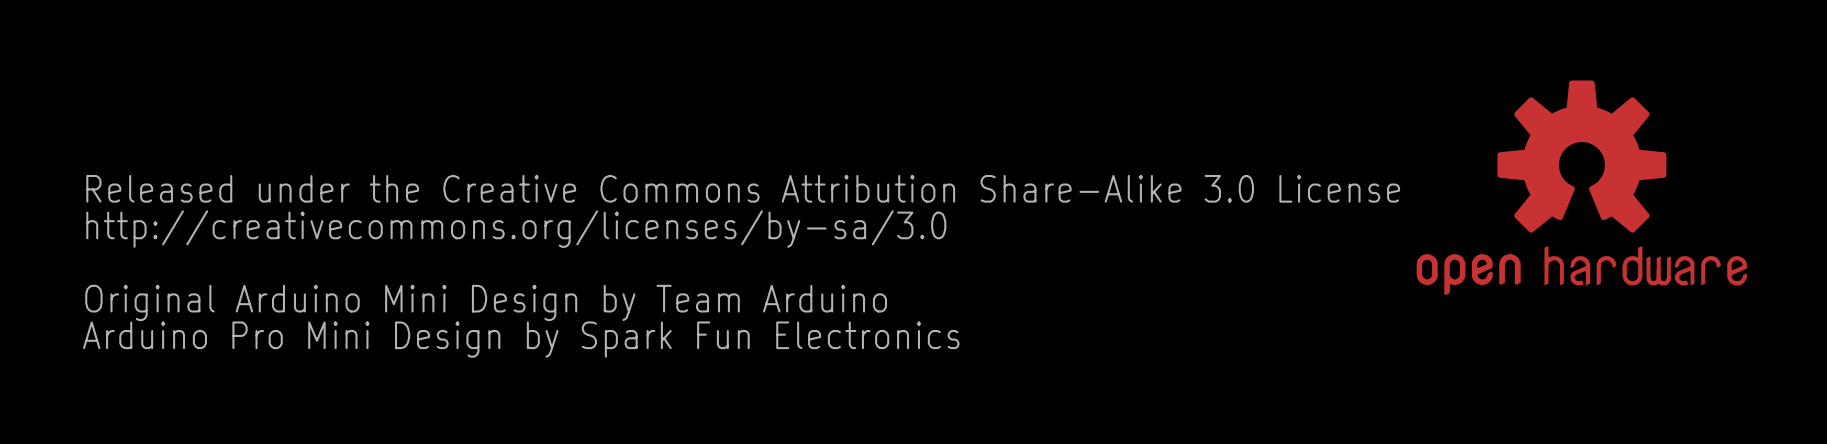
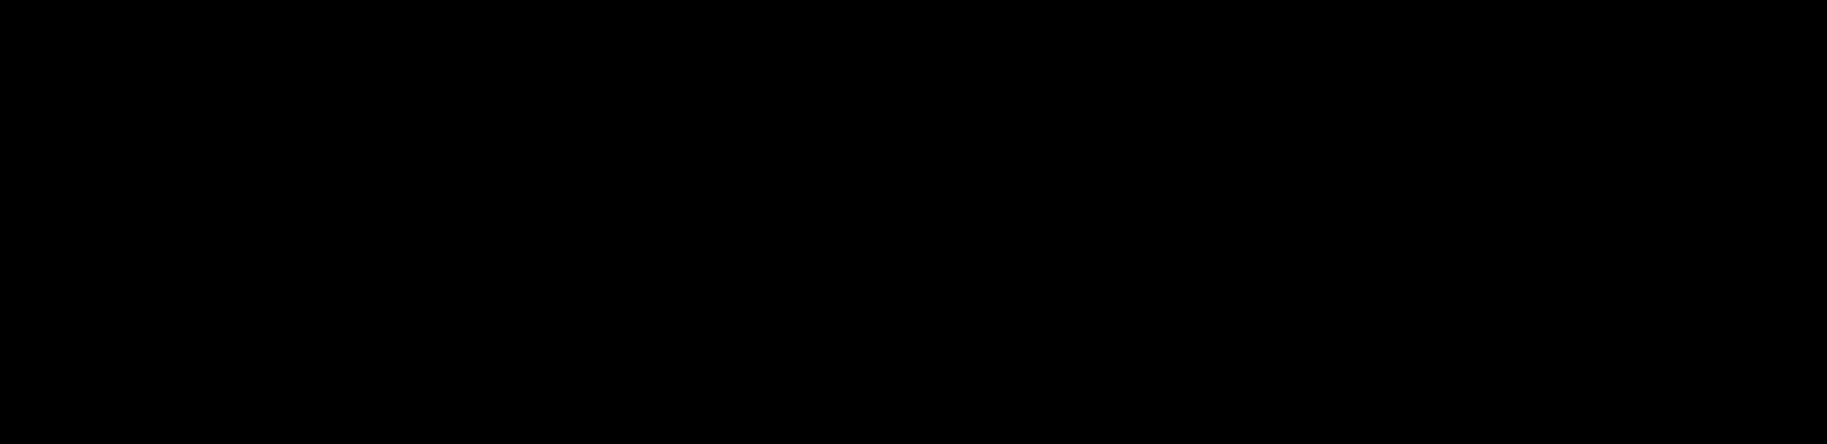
part: (1581, 187) -> none
text: Released under the Creative Commons Attribution Share-Alike 3.0 License (743, 188) -> none
text: http://creativecommons.org/licenses/by-sa/3.0 (516, 229) -> none
text: Original Arduino Mini Design by Team Arduino (486, 302) -> none
text: Arduino Pro Mini Design by Spark Fun Electronics (521, 339) -> none

